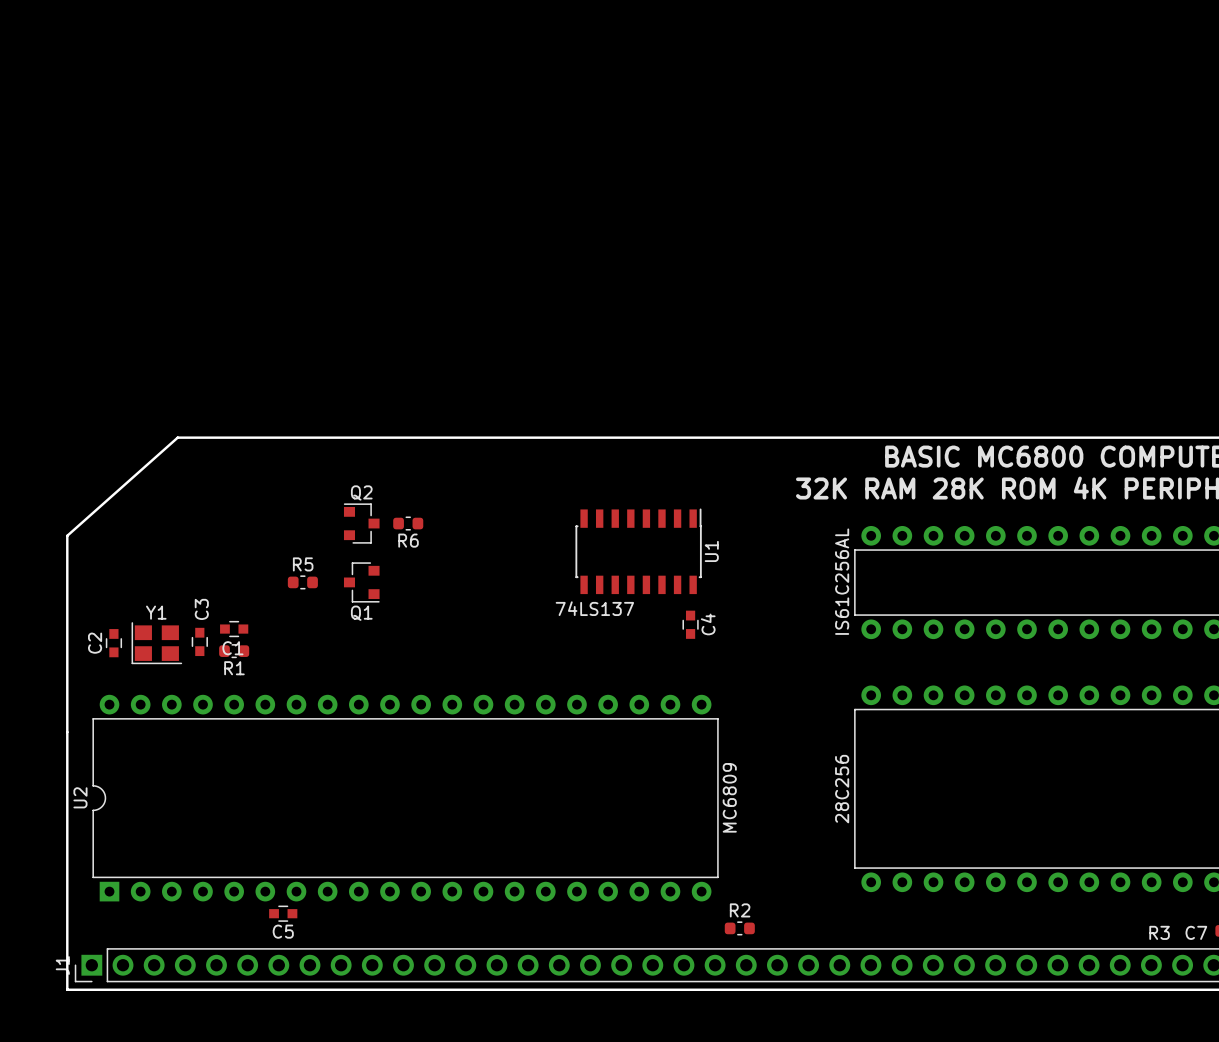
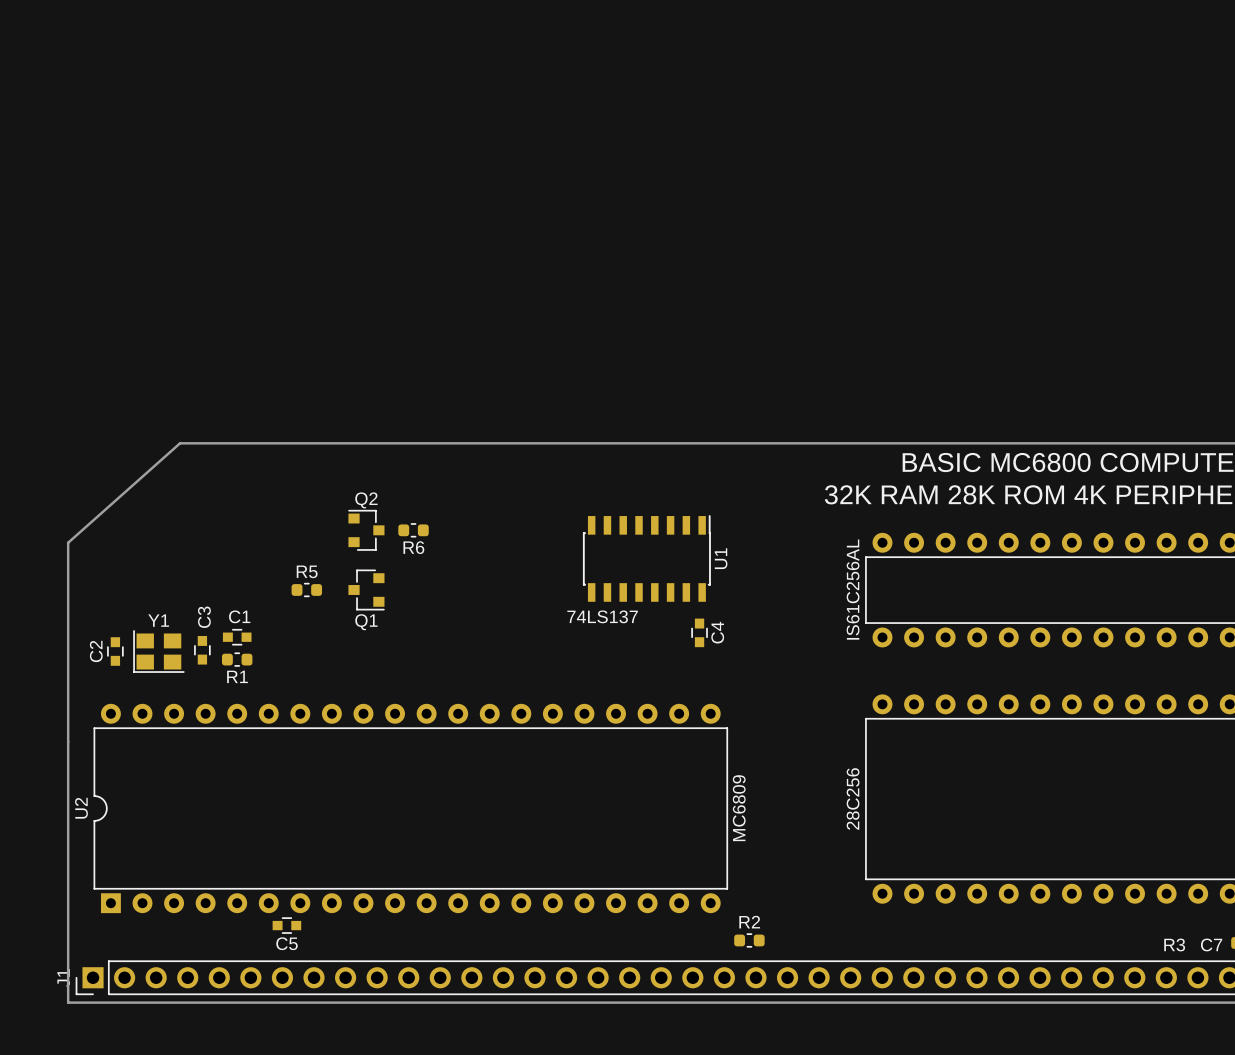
C1 name position: C1 (232, 648) -> C1 (239, 616)

